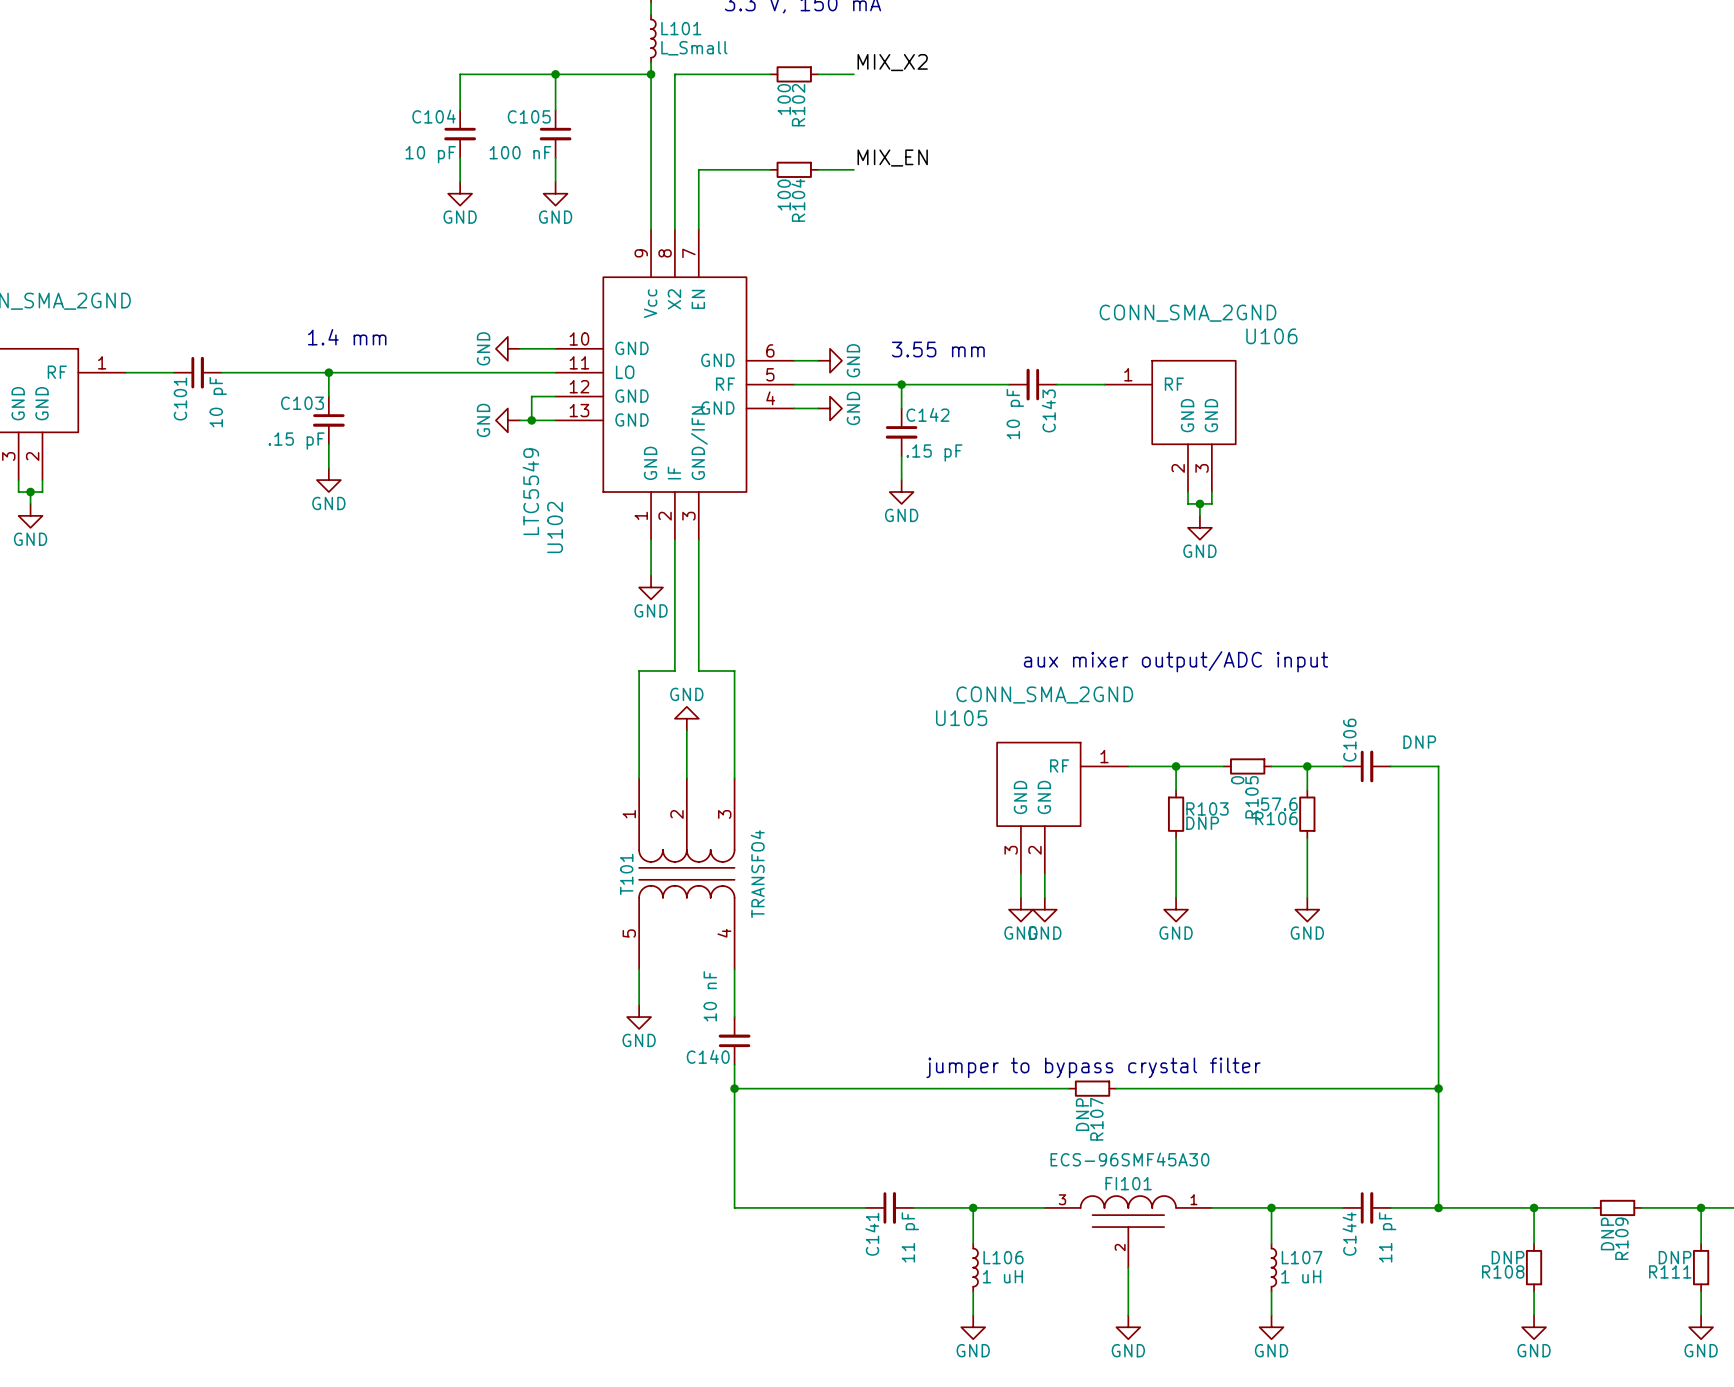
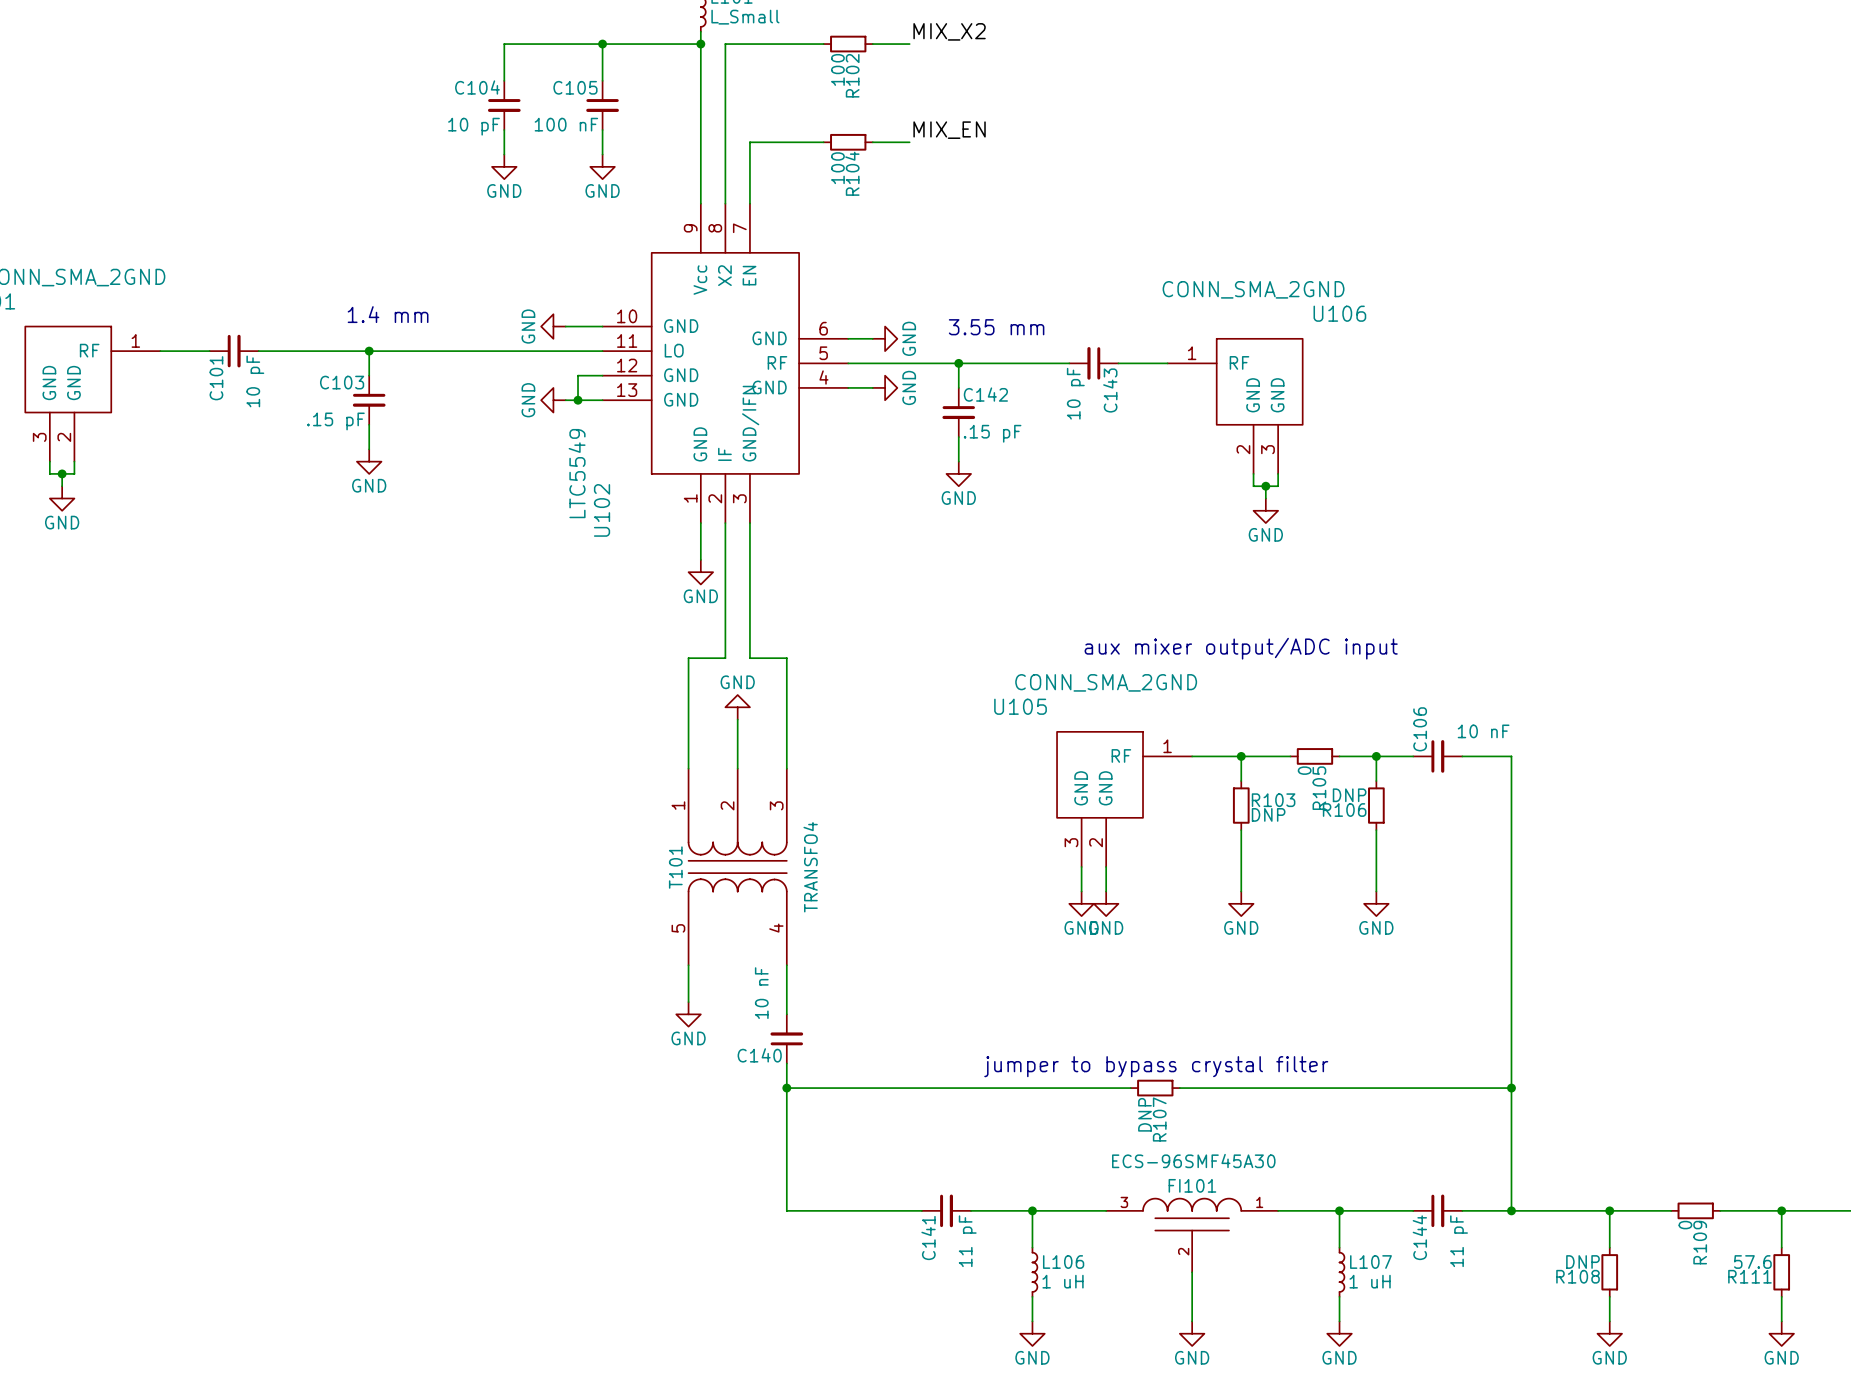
C106 value: DNP (1419, 742) -> 10 nF (1483, 731)
R106 value: 57.6 (1279, 804) -> DNP (1349, 795)
R109 value: DNP (1607, 1233) -> 0 (1685, 1225)
R111 value: DNP (1675, 1257) -> 57.6 (1752, 1262)

